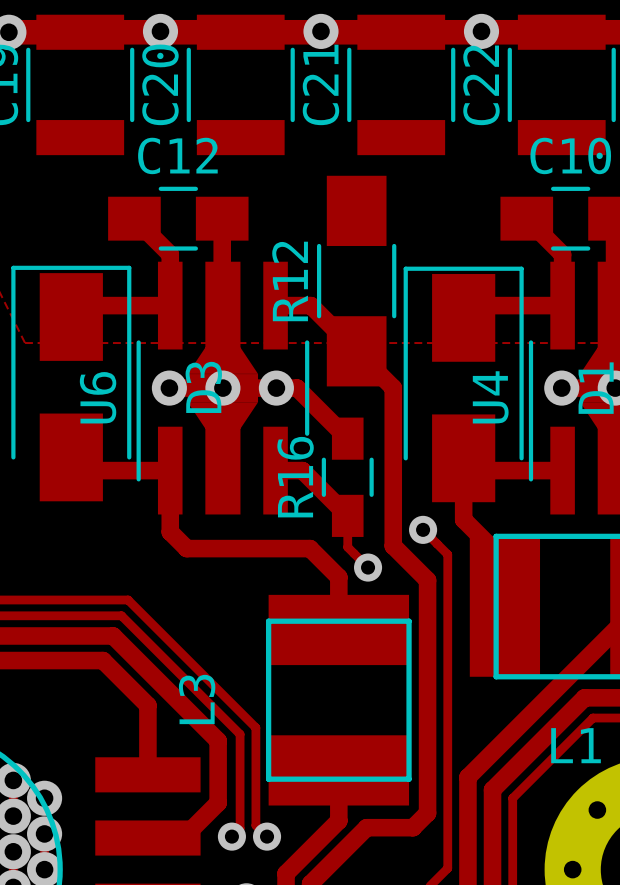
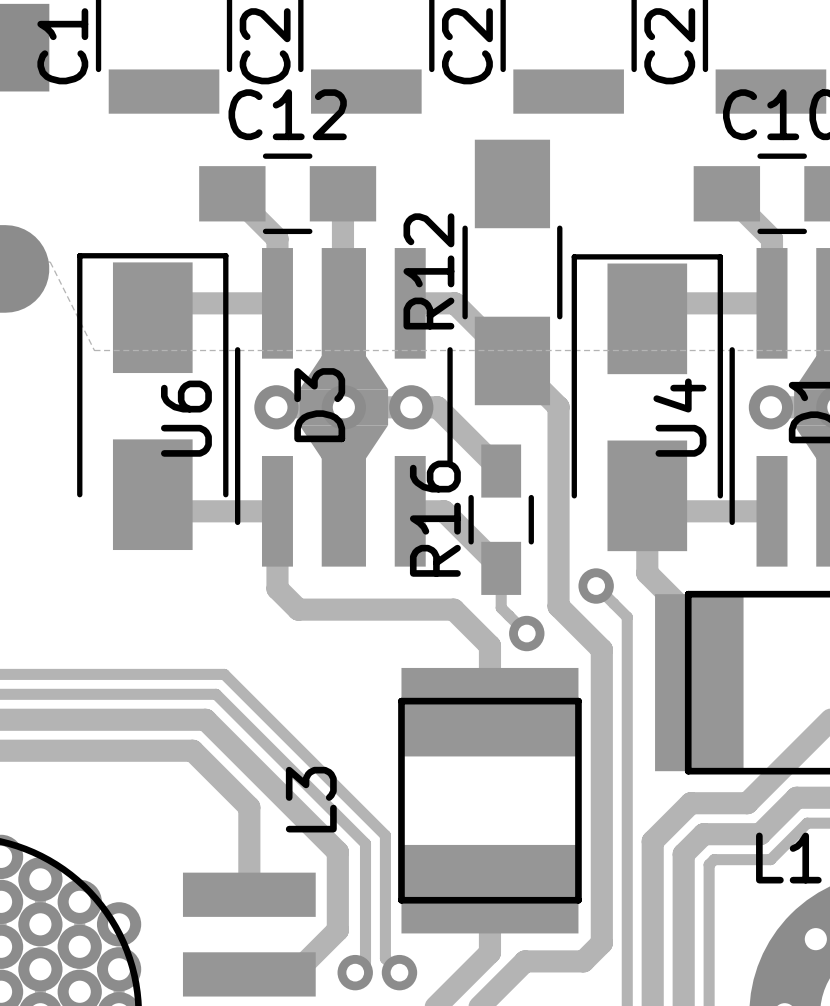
track: (584, 697) (492, 789) -> (799, 797) (796, 797) (760, 834) (703, 834) (683, 854) (683, 913)
track: (543, 702) (467, 777) -> (747, 803) (690, 803) (652, 841) (652, 897)
track: (592, 718) (512, 798) -> (810, 823) (807, 823) (770, 859) (714, 859) (709, 864) (709, 924)

